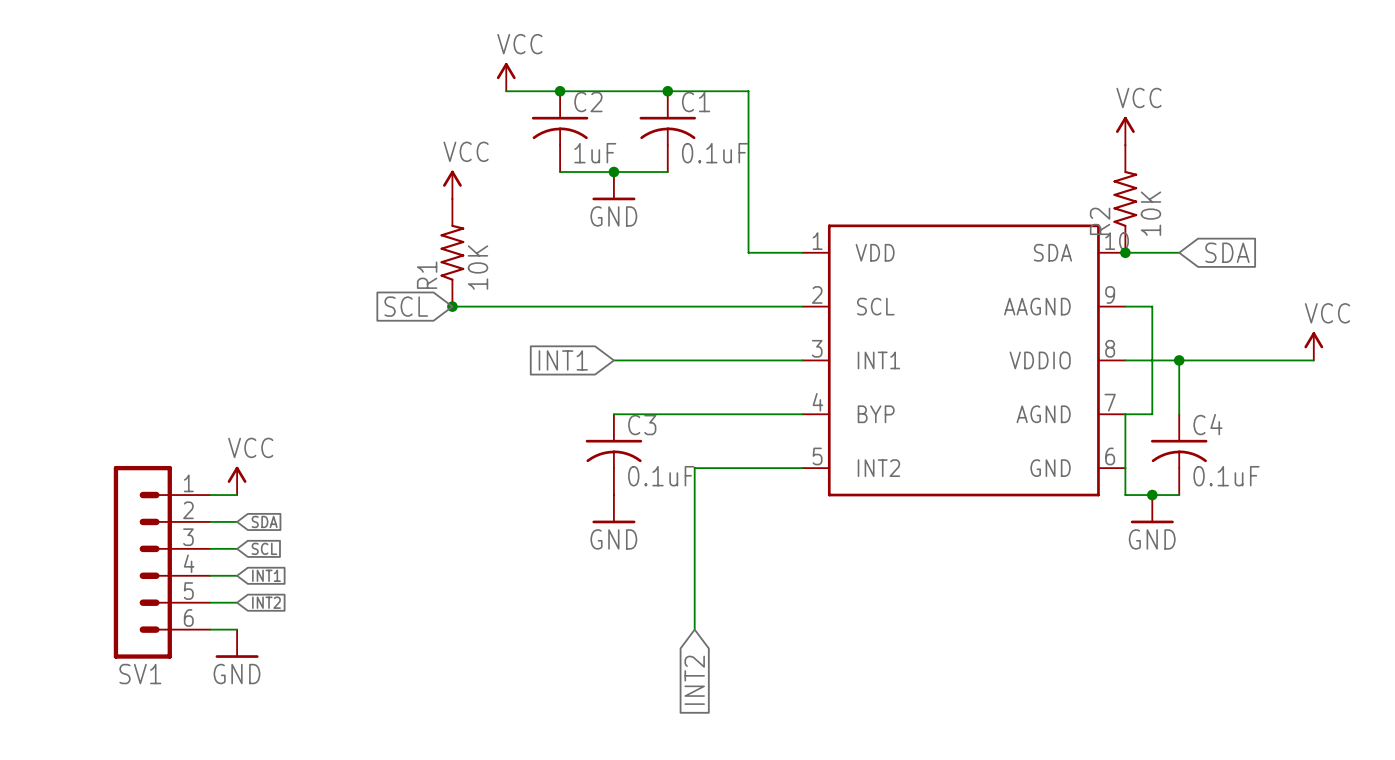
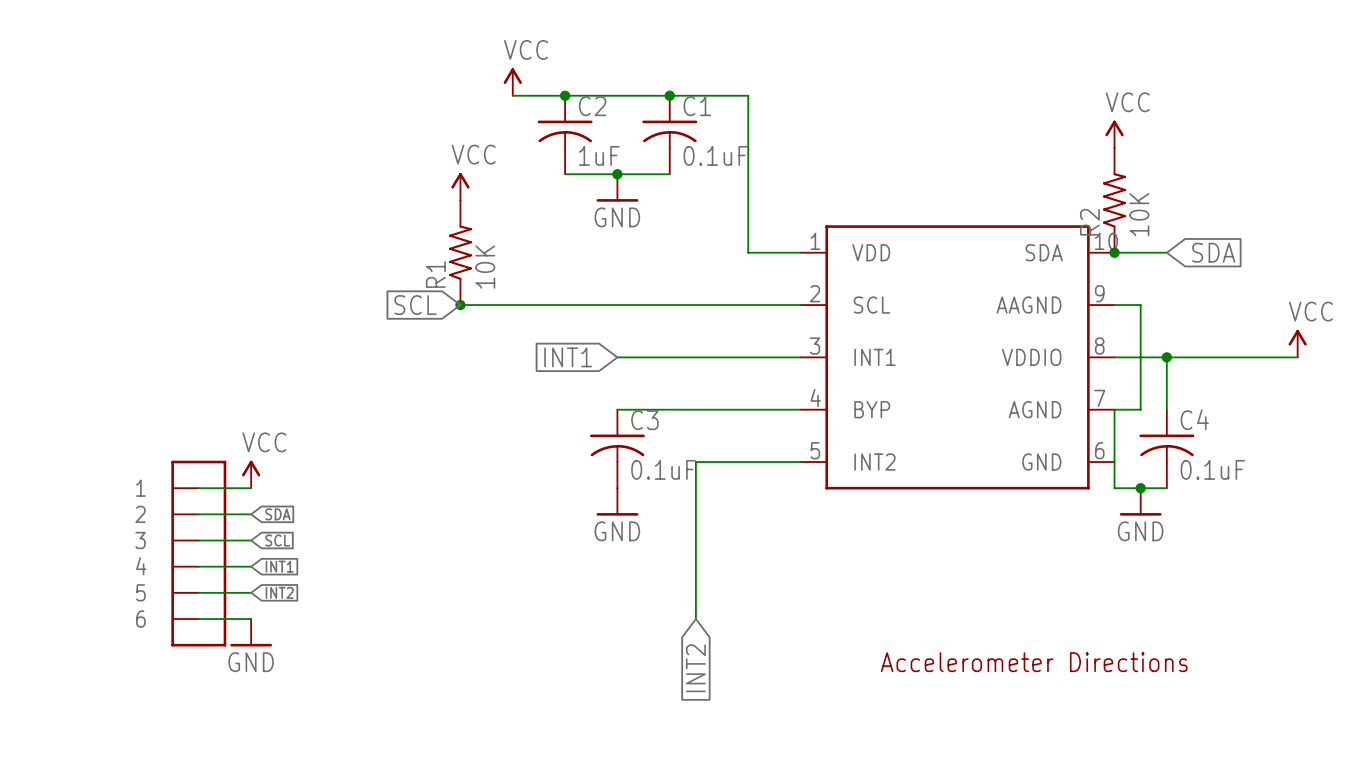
SV1: (161, 562) -> none
part: none -> (198, 553)
part: none -> (1034, 662)

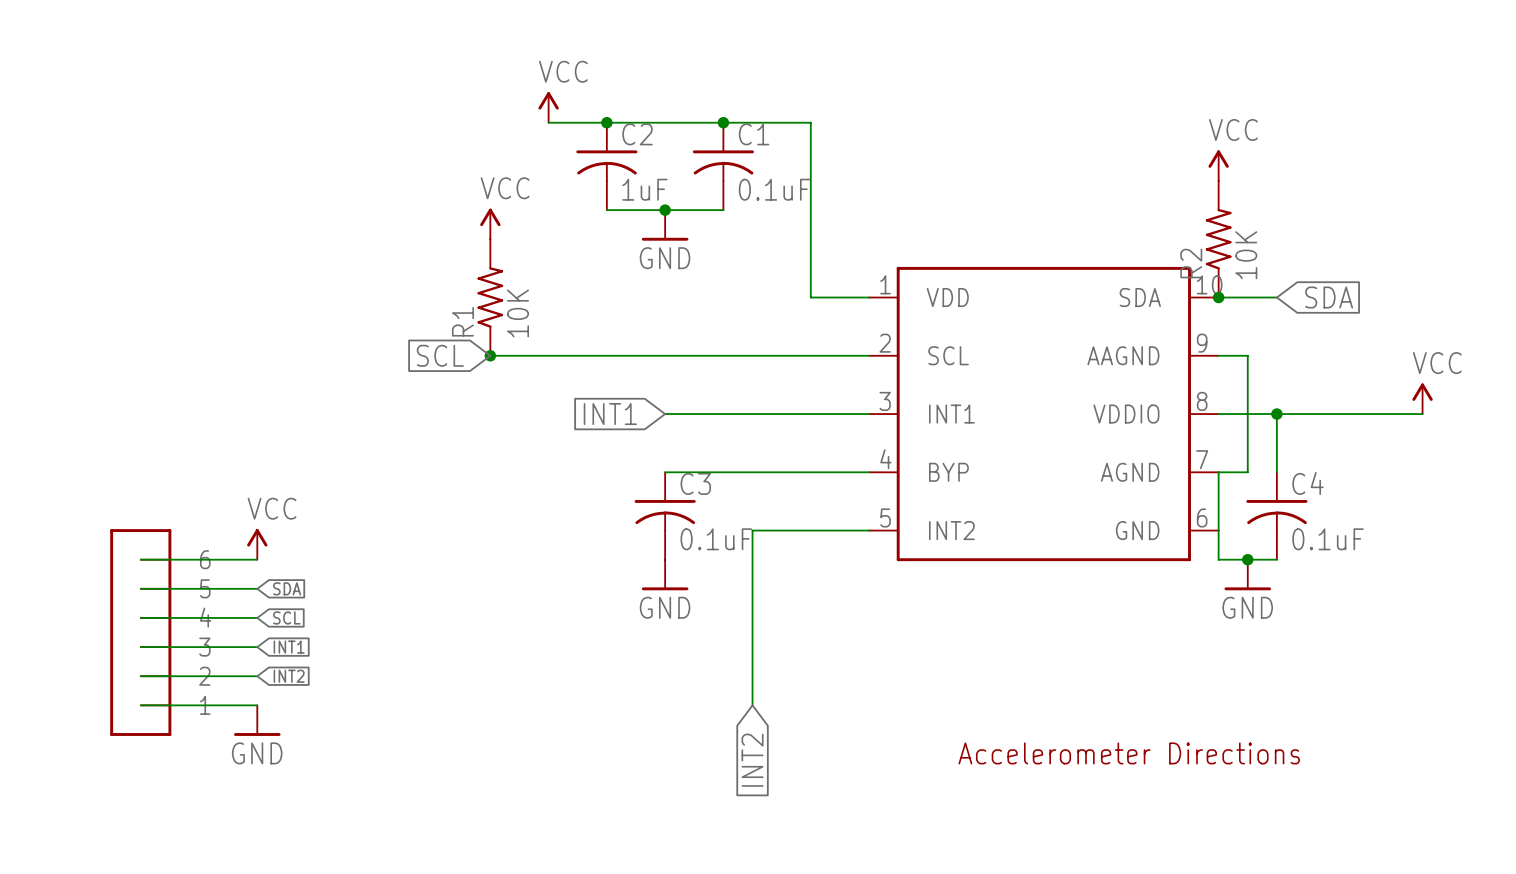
part rotation: 0° (198, 553) -> 180° (140, 632)

